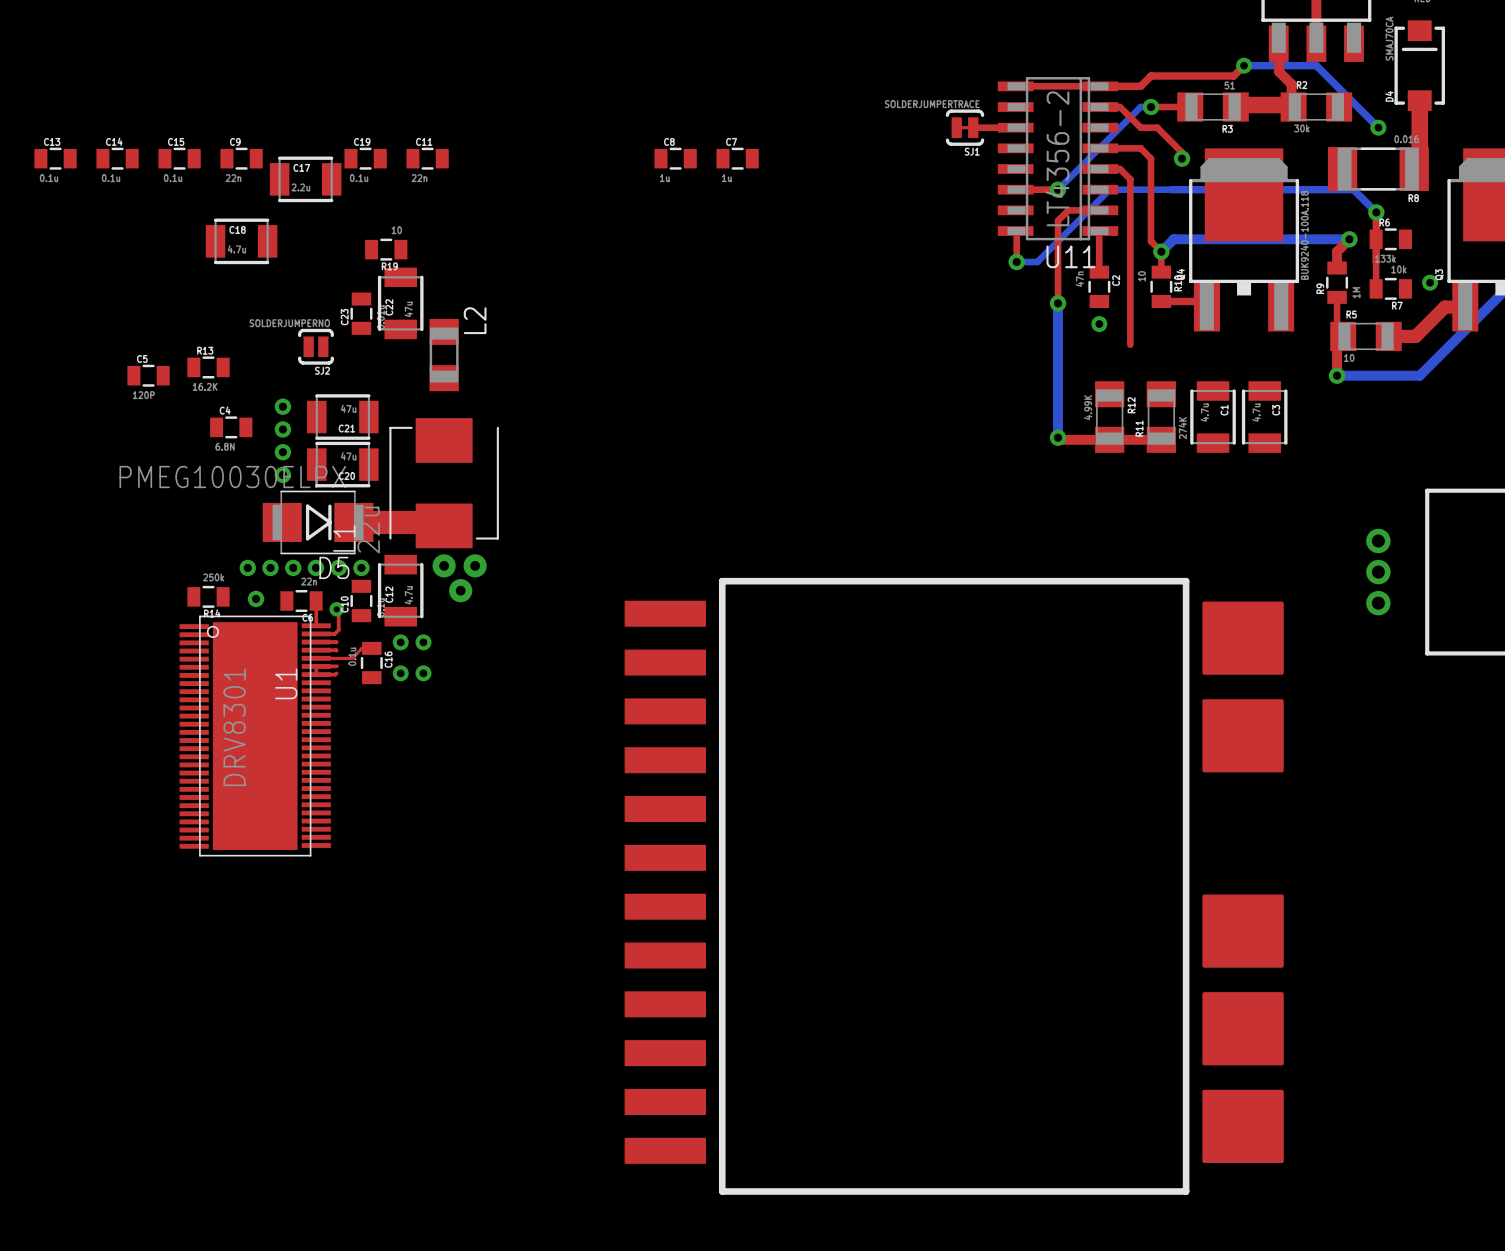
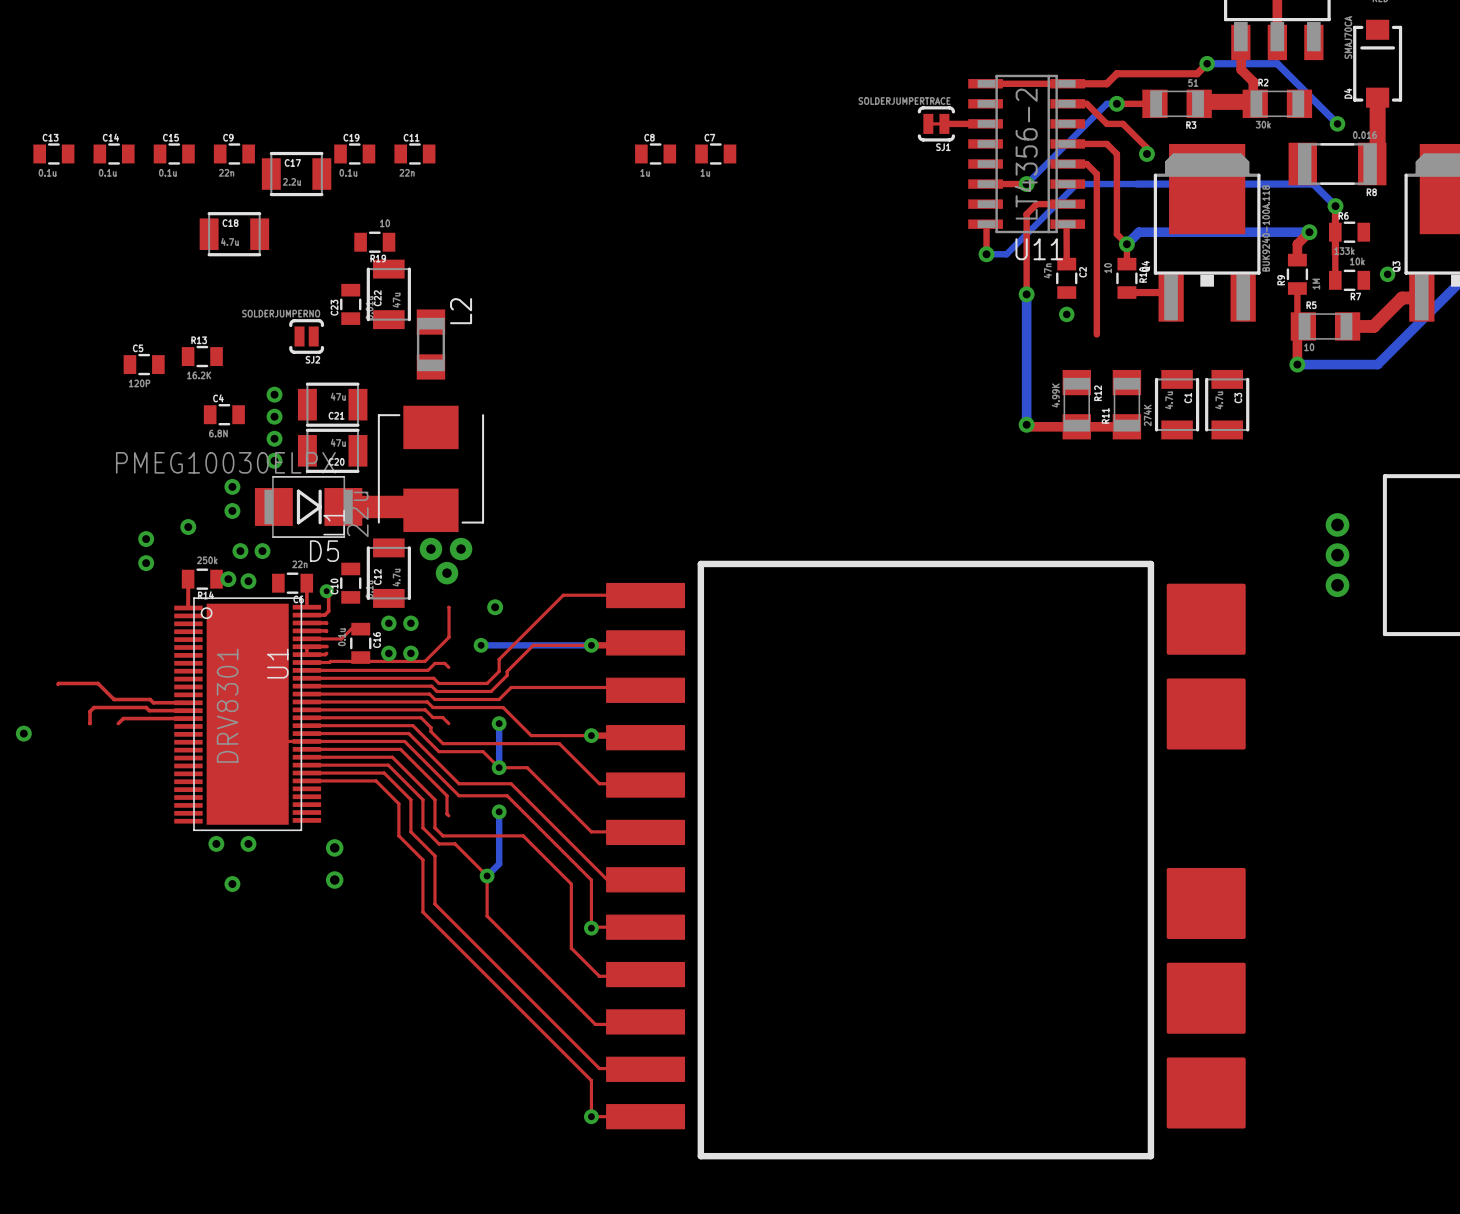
via: none -> (232, 486)
via: none -> (232, 510)
via: none -> (188, 527)
via: none -> (146, 539)
via: (293, 567) -> none
via: (315, 567) -> none
via: (338, 567) -> none
via: (361, 567) -> none
via: none -> (146, 563)
via: none -> (228, 579)
top track: none -> (188, 581) (188, 608)
top track: none -> (627, 595) (563, 595) (499, 659) (499, 671) (487, 683) (438, 683) (433, 678) (306, 678)
top track: none -> (449, 607) (449, 637) (424, 661) (306, 662)
via: none -> (495, 607)
top track: none -> (635, 639) (631, 645) (533, 645) (507, 671) (507, 675) (491, 691) (436, 691) (431, 686) (306, 686)
bottom track: none -> (481, 645) (591, 645)
via: none -> (481, 645)
via: none -> (591, 645)
top track: none -> (448, 667) (444, 663) (434, 663) (427, 670) (306, 670)
top track: none -> (57, 684) (98, 683) (114, 699) (150, 699) (153, 702) (188, 702)
top track: none -> (645, 690) (642, 687) (511, 687) (499, 699) (434, 699) (429, 694) (306, 694)
top track: none -> (306, 701) (427, 701) (432, 707) (503, 707) (531, 735) (643, 735) (645, 737)
top track: none -> (306, 709) (425, 709) (432, 717) (442, 717) (448, 723)
top track: none -> (188, 710) (149, 710) (146, 707) (94, 707) (90, 711) (90, 723)
top track: none -> (306, 717) (421, 717) (443, 743) (559, 743) (599, 783) (645, 785)
top track: none -> (188, 718) (123, 718) (118, 723)
bottom track: none -> (499, 723) (499, 767)
via: none -> (499, 723)
top track: none -> (306, 725) (412, 725) (438, 751) (483, 751) (499, 767) (527, 767) (591, 831) (635, 831)
top track: none -> (306, 733) (408, 733) (459, 783) (511, 783) (611, 884) (641, 884) (645, 879)
via: none -> (23, 733)
via: none -> (591, 735)
top track: none -> (250, 739) (252, 741) (404, 741) (459, 795) (507, 795) (591, 880) (591, 928) (645, 927)
top track: none -> (306, 749) (400, 749) (447, 795) (447, 814) (448, 815)
top track: none -> (306, 757) (392, 757) (434, 799) (434, 827) (443, 835) (523, 835) (571, 884) (571, 948) (599, 976) (643, 976) (645, 974)
top track: none -> (306, 765) (388, 765) (422, 799) (422, 827) (438, 843) (455, 843) (487, 876) (487, 916) (595, 1024) (643, 1024) (645, 1021)
via: none -> (499, 767)
top track: none -> (306, 773) (384, 773) (410, 799) (410, 831) (434, 855) (434, 904) (599, 1068) (645, 1069)
top track: none -> (306, 780) (376, 780) (398, 803) (398, 835) (422, 859) (422, 912) (591, 1080) (591, 1116) (619, 1116) (623, 1112) (641, 1112) (645, 1116)
bottom track: none -> (499, 811) (499, 863) (487, 876)
via: none -> (499, 811)
via: none -> (216, 843)
via: none -> (248, 843)
via: none -> (334, 847)
via: none -> (487, 876)
via: none -> (334, 880)
via: none -> (232, 884)
via: none -> (591, 928)
via: none -> (591, 1116)

